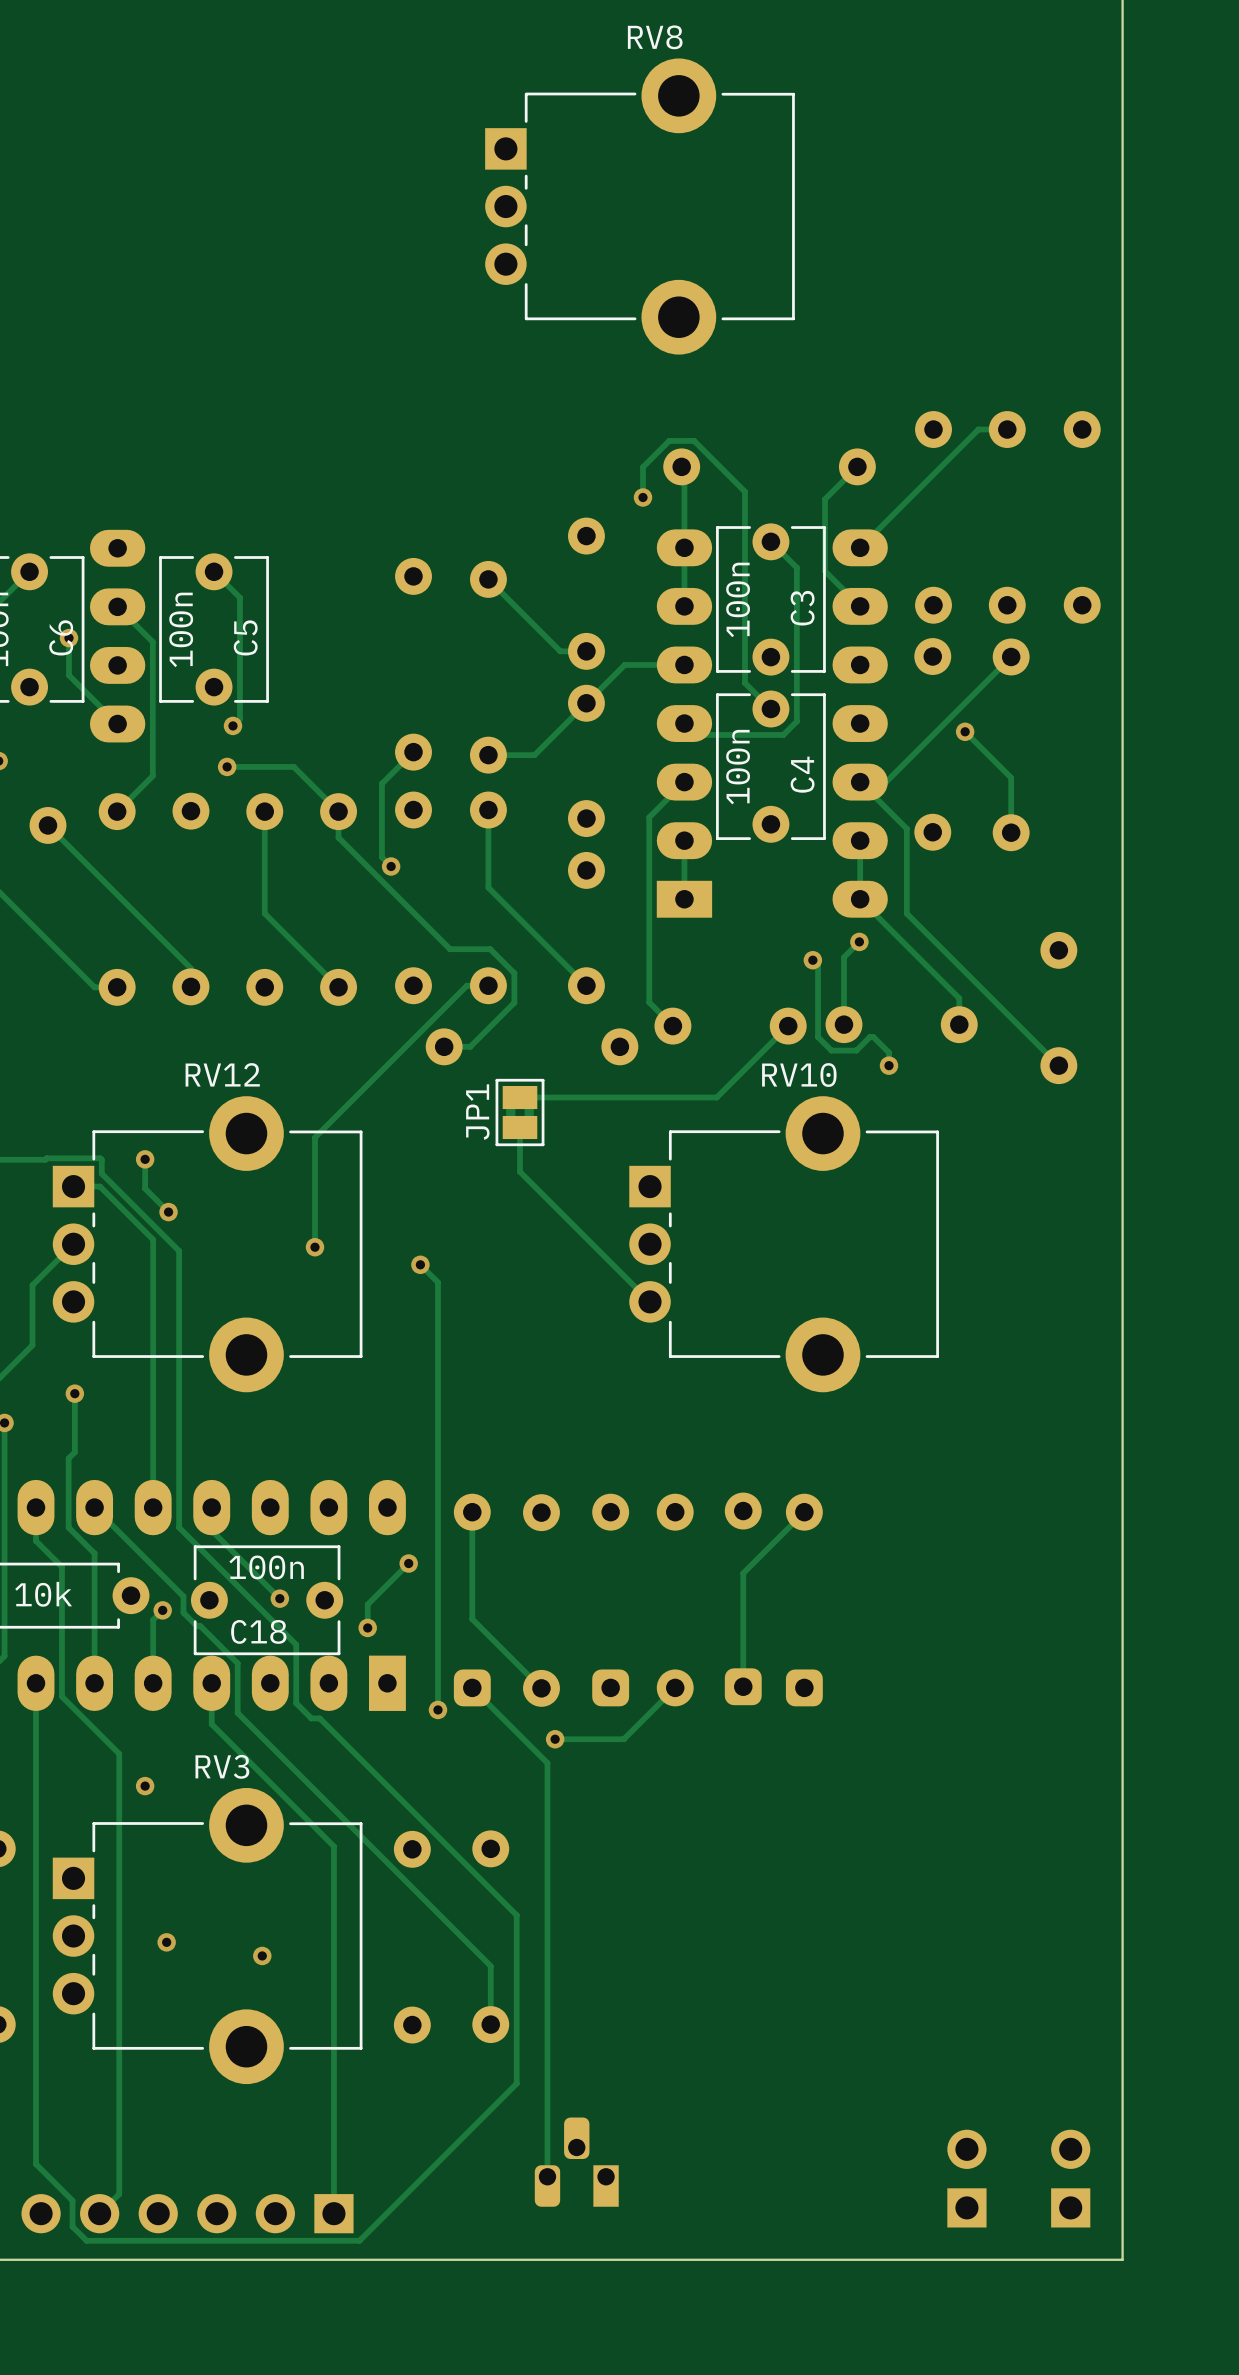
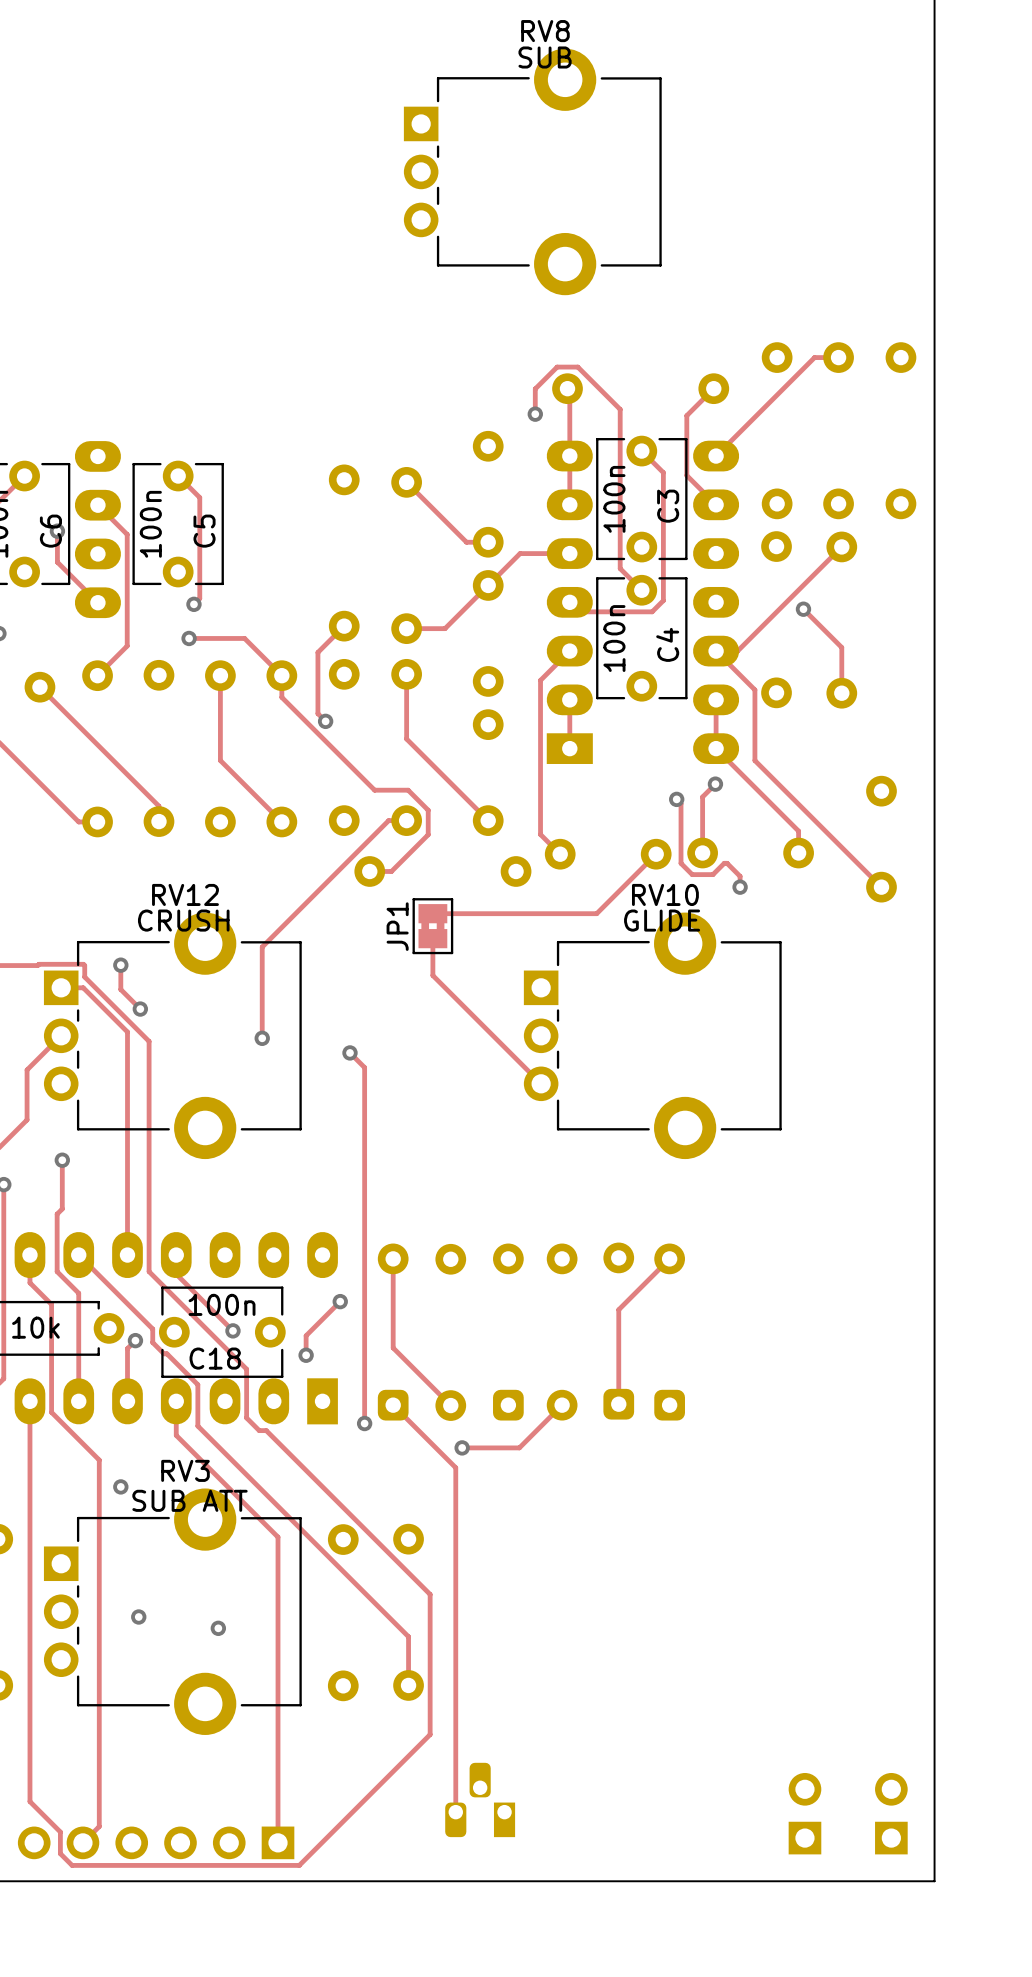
RV8 value: none -> SUB (545, 57)
RV12 value: none -> CRUSH (183, 920)
RV10 value: none -> GLIDE (662, 920)
RV3 value: none -> SUB ATT (190, 1500)

